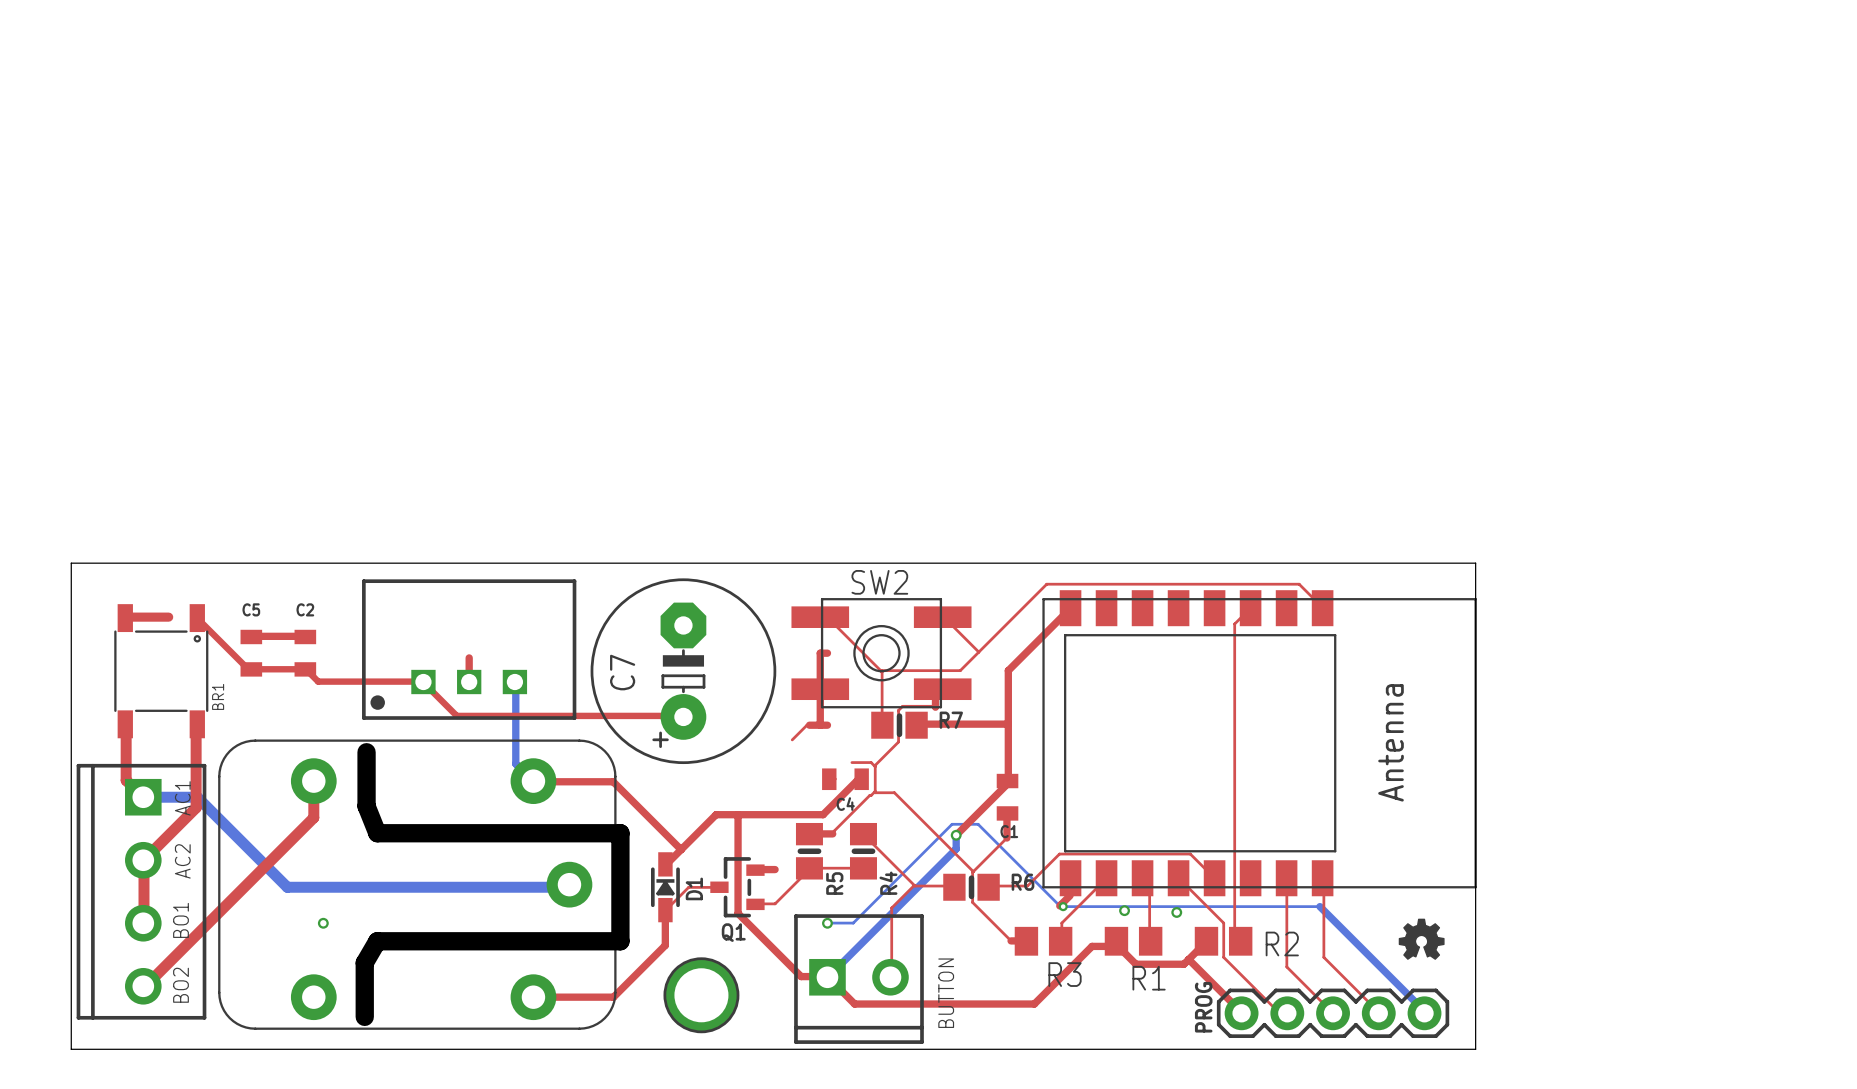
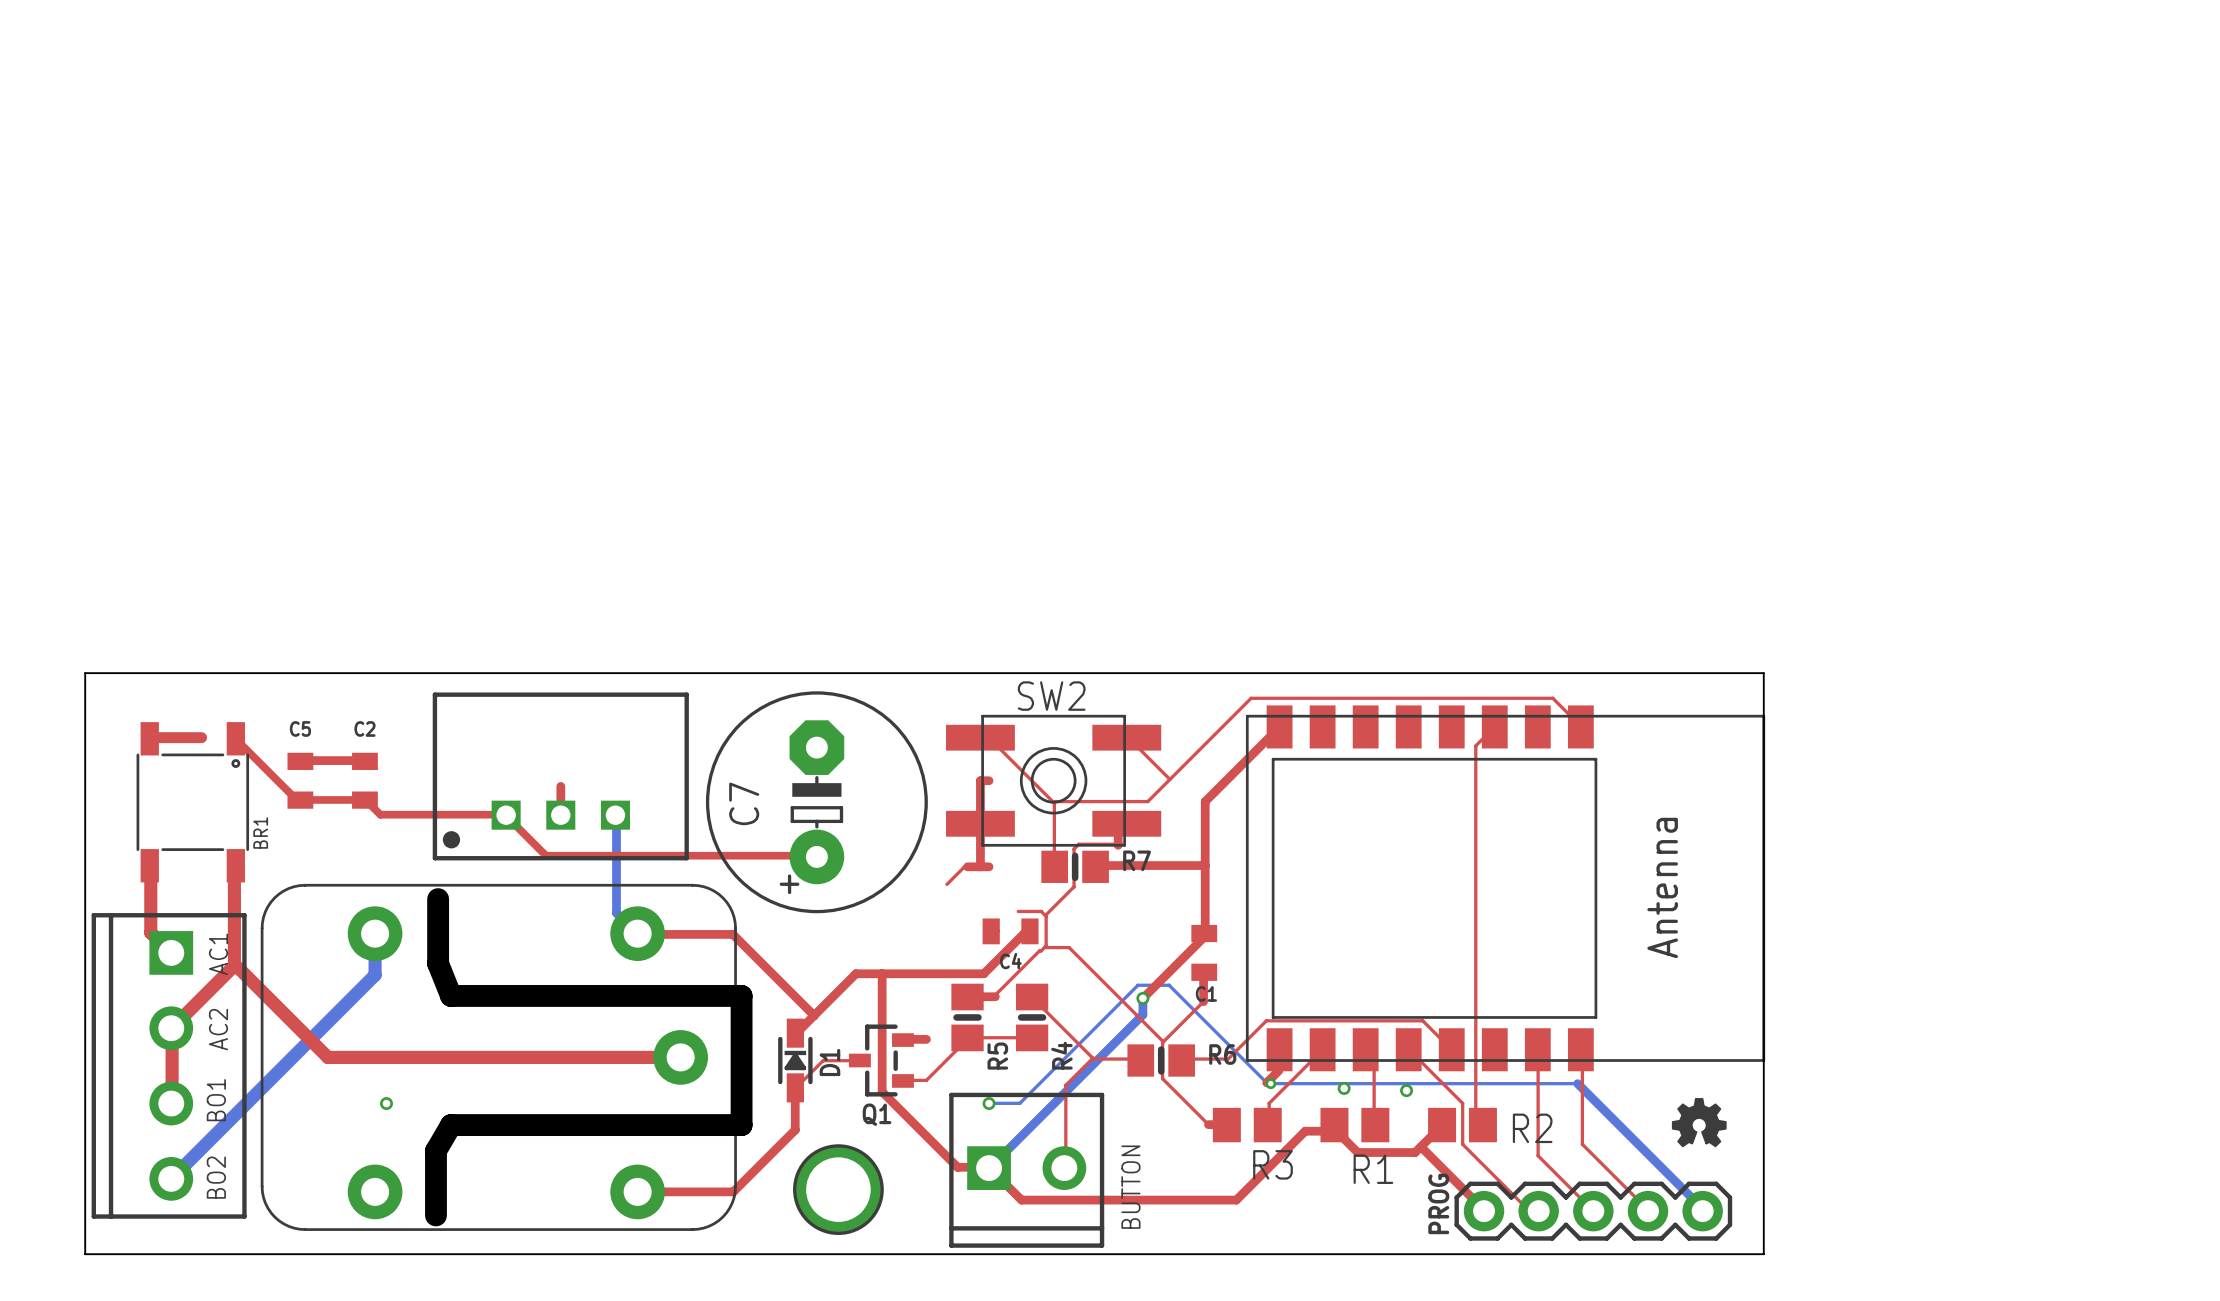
top track: (313, 781) (313, 817) (143, 987) -> none
bottom track: none -> (375, 933) (375, 975) (171, 1178)
bottom track: (143, 797) (197, 797) (287, 887) (566, 887) (569, 884) -> none
top track: none -> (234, 965) (327, 1057) (680, 1057)

